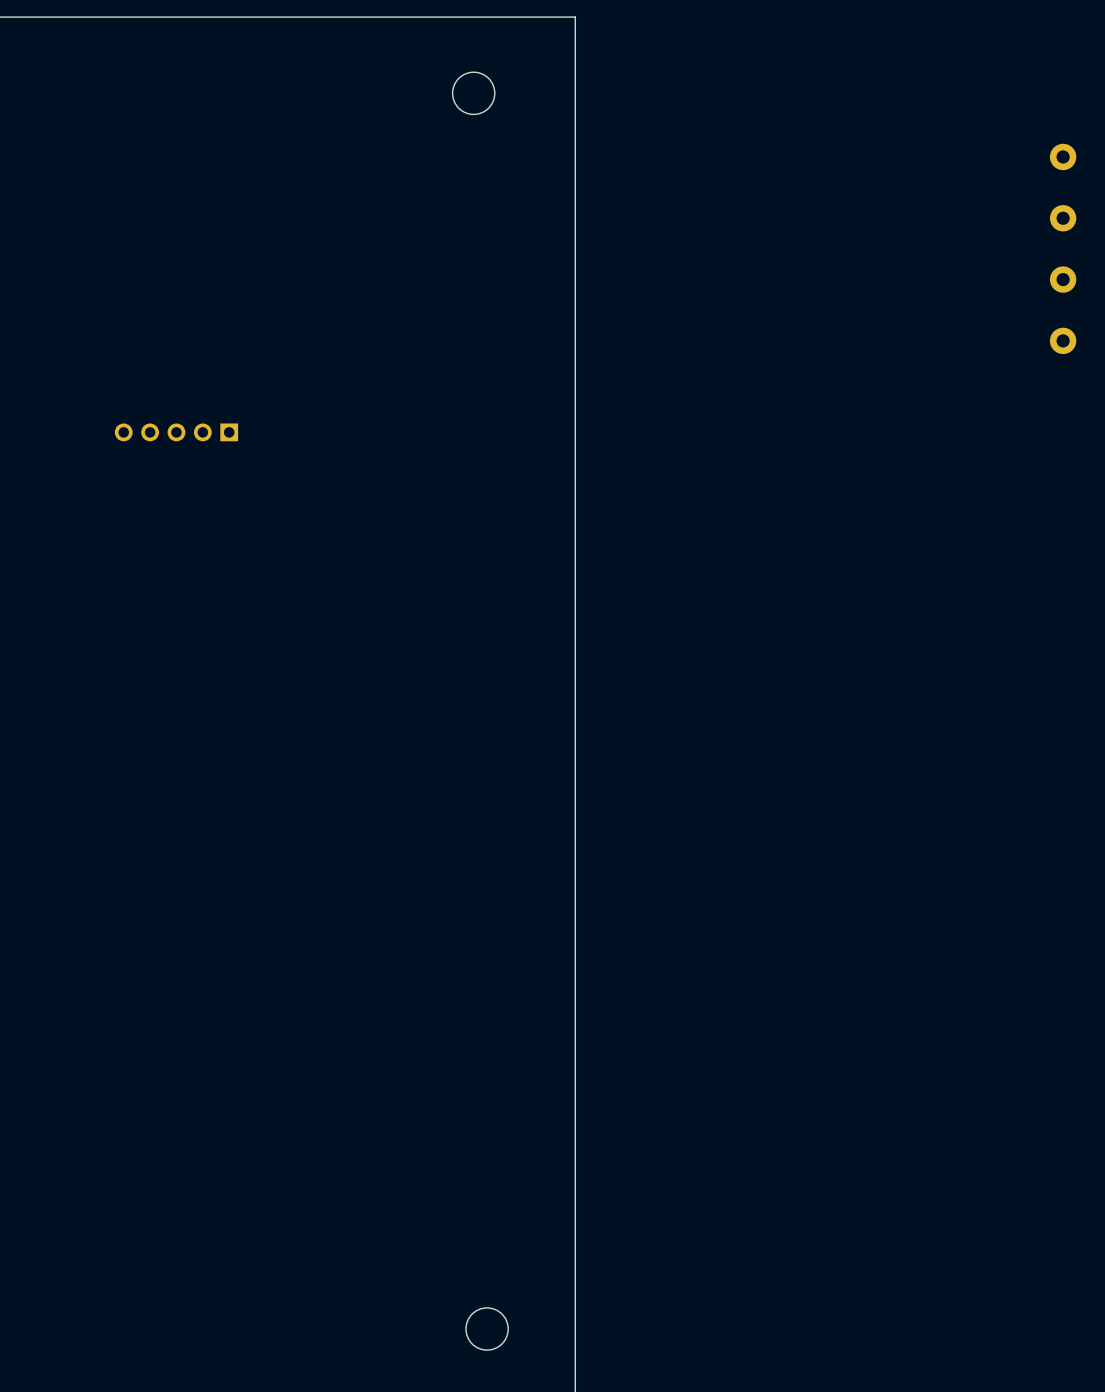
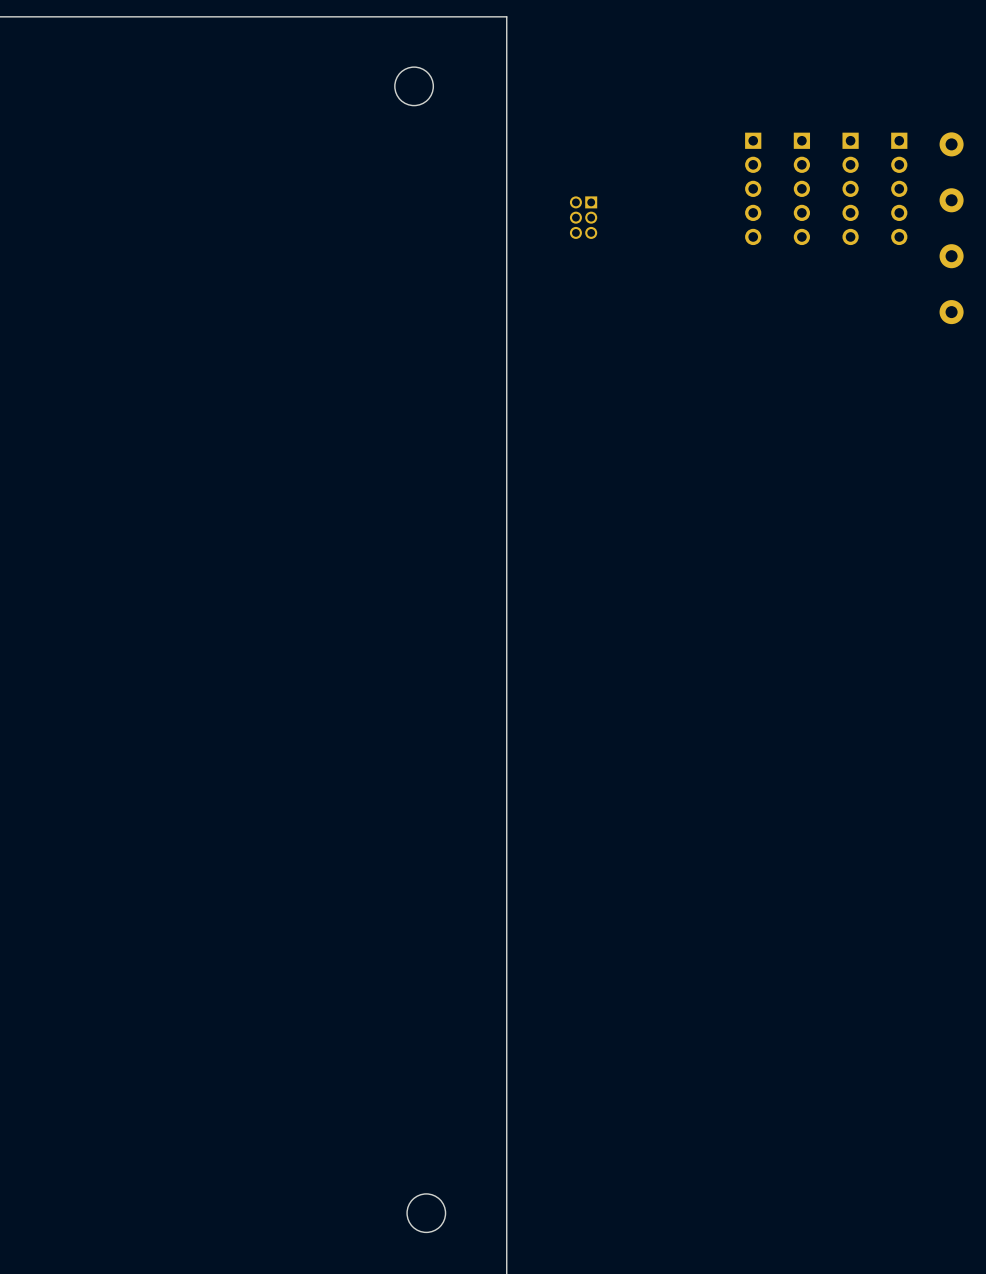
part: none -> (753, 188)
part: none -> (801, 188)
part: none -> (850, 188)
part: none -> (899, 188)
part: none -> (583, 217)
part: (176, 432) -> none

